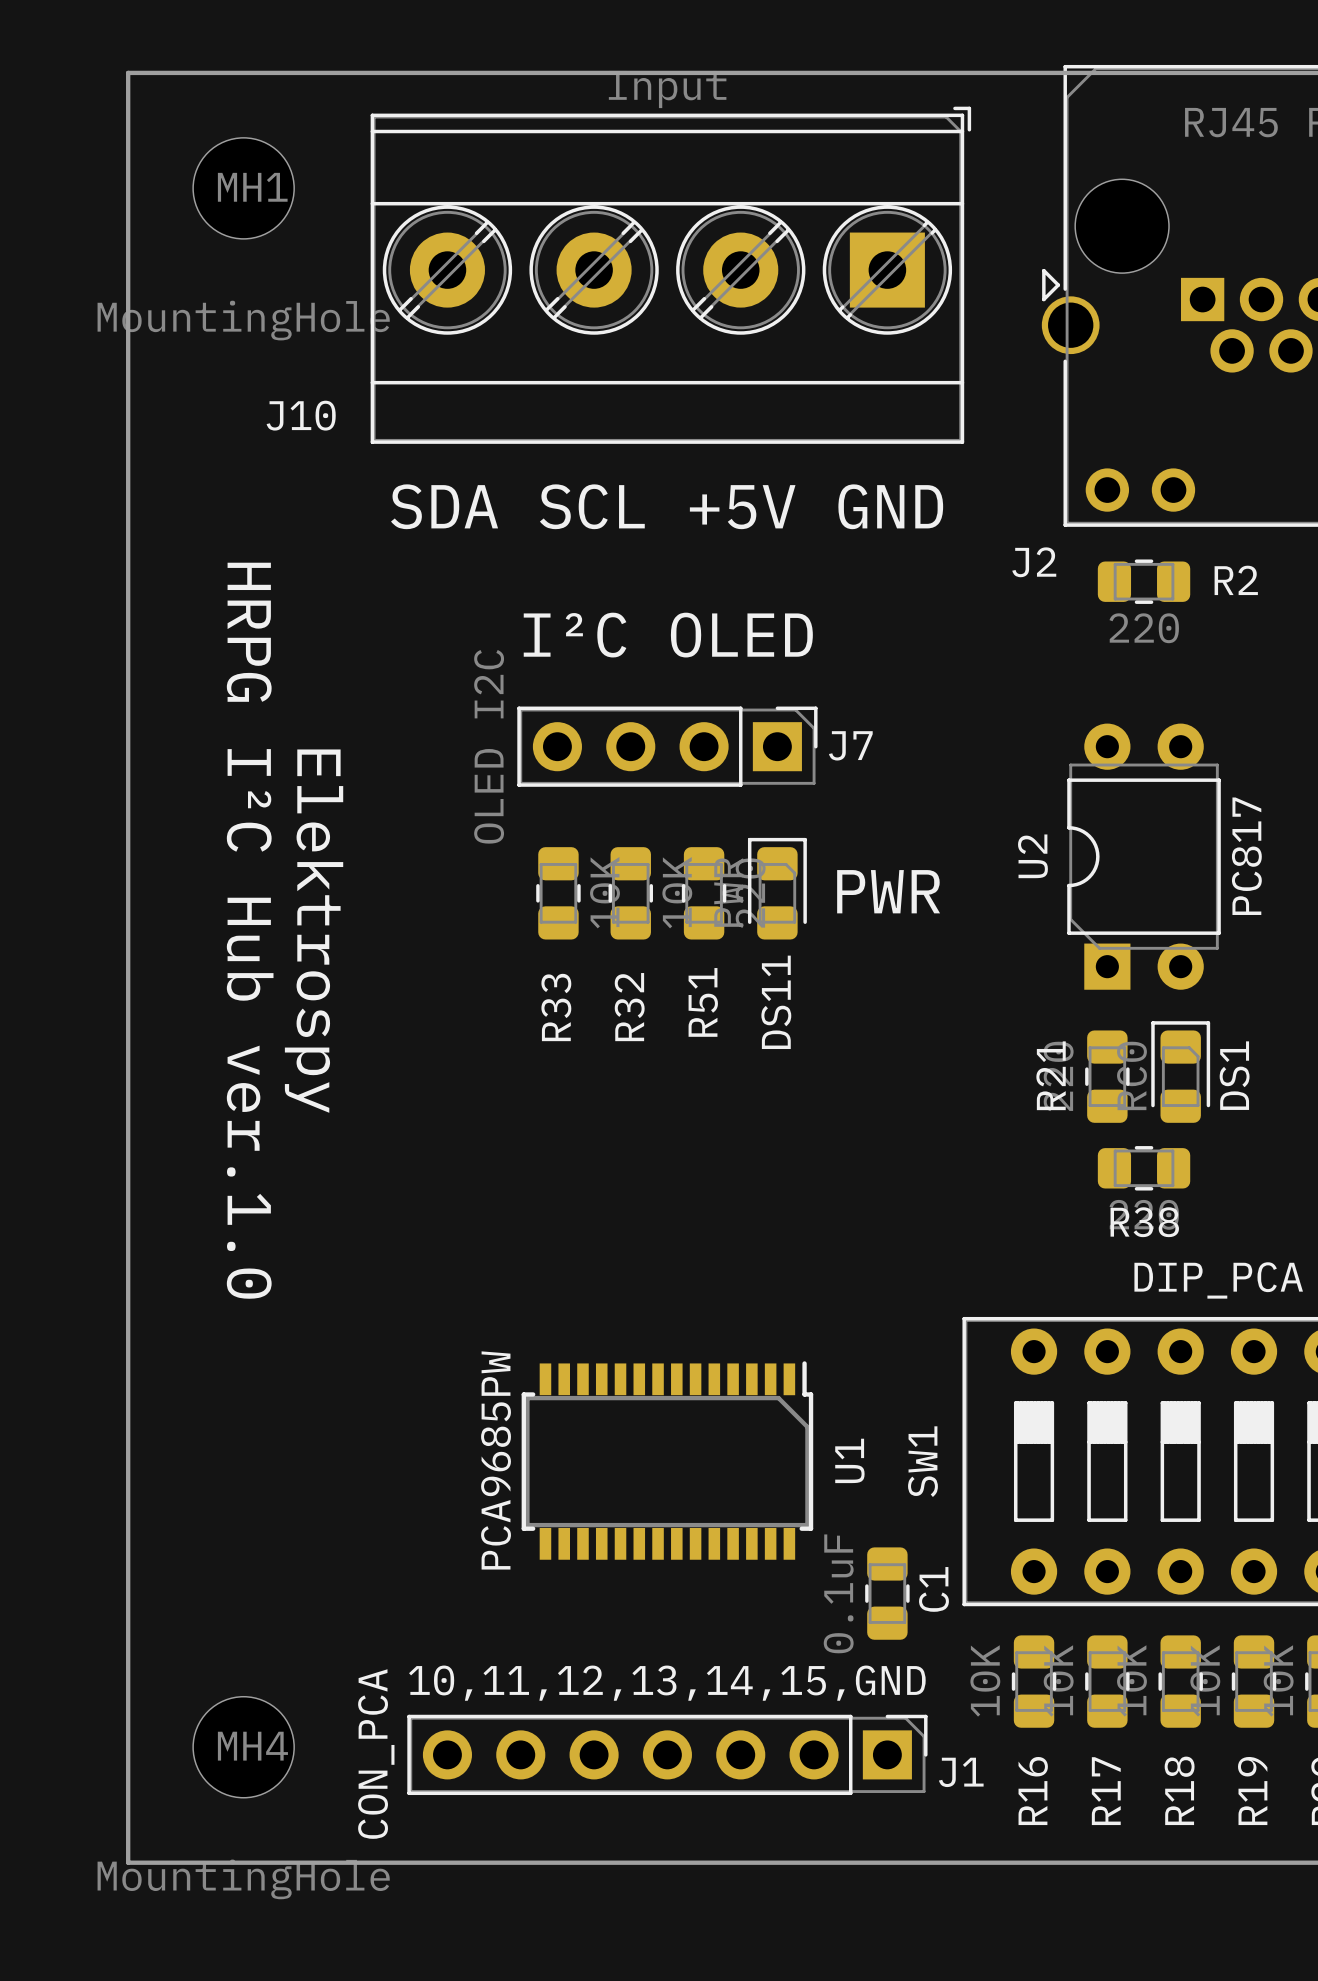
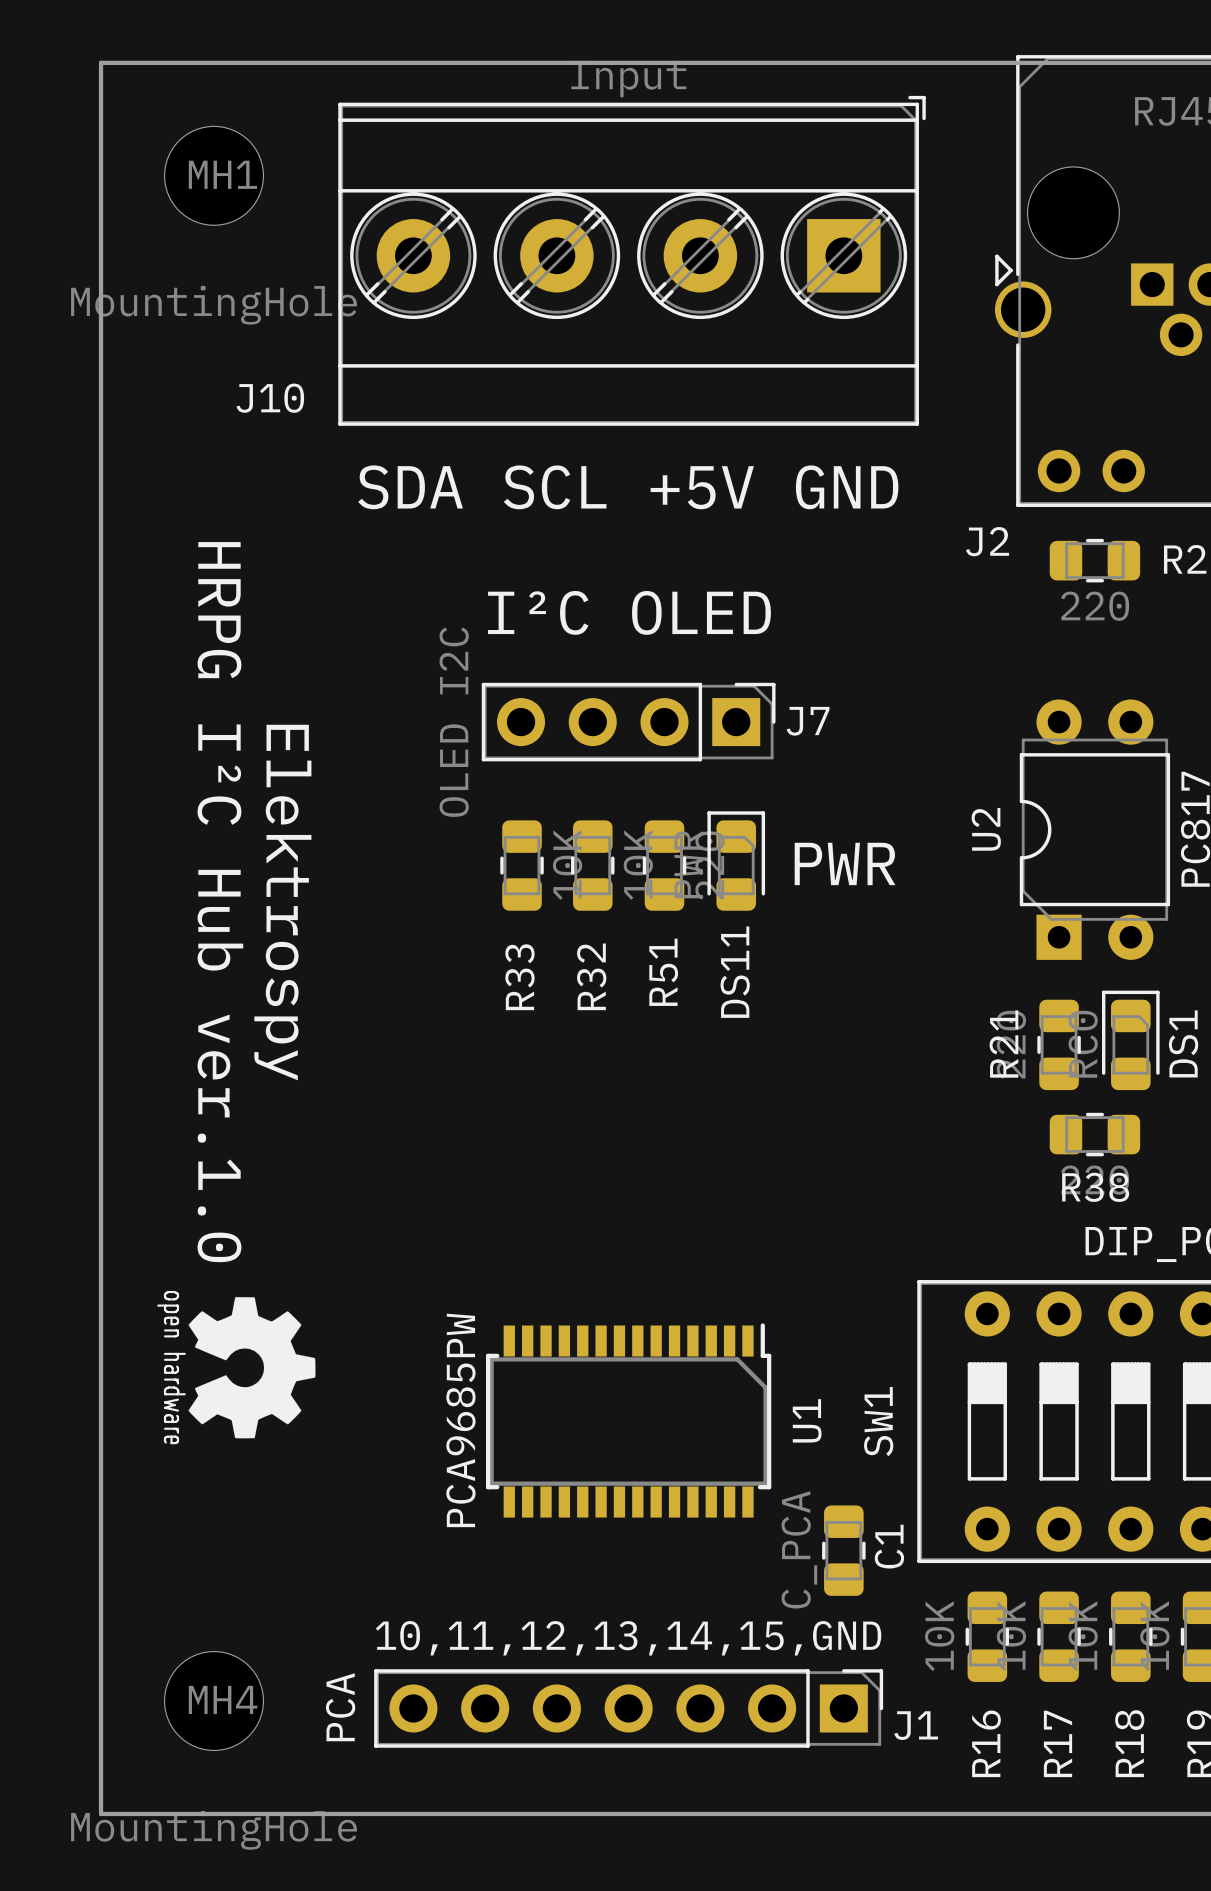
drawing: none -> [157, 1290, 316, 1445]
C1 value: 0.1uF (838, 1593) -> C_PCA (799, 1549)
J1 value: CON_PCA (376, 1754) -> PCA (340, 1707)

